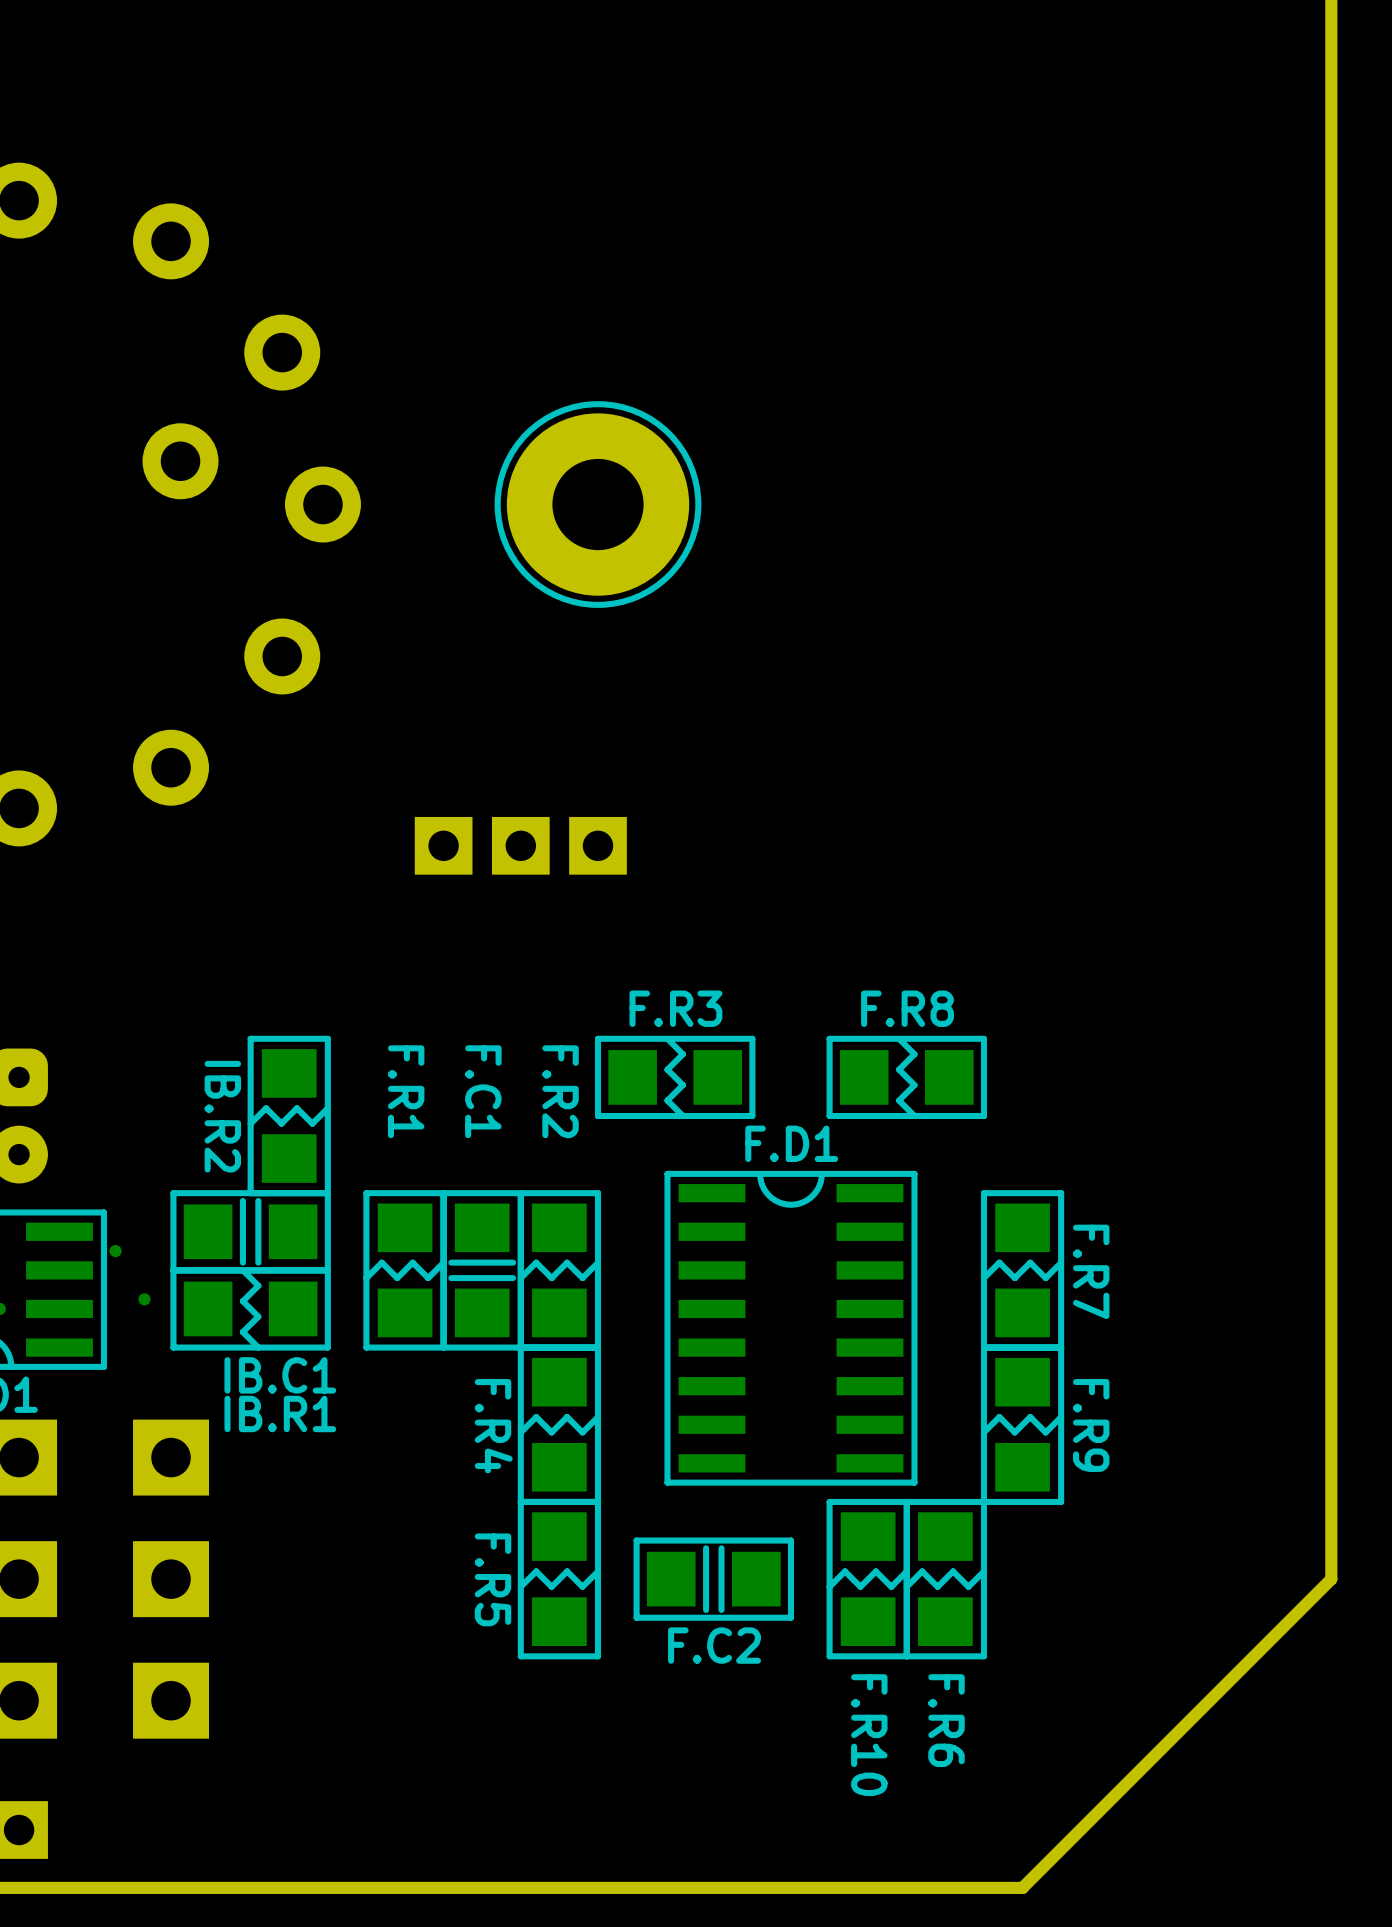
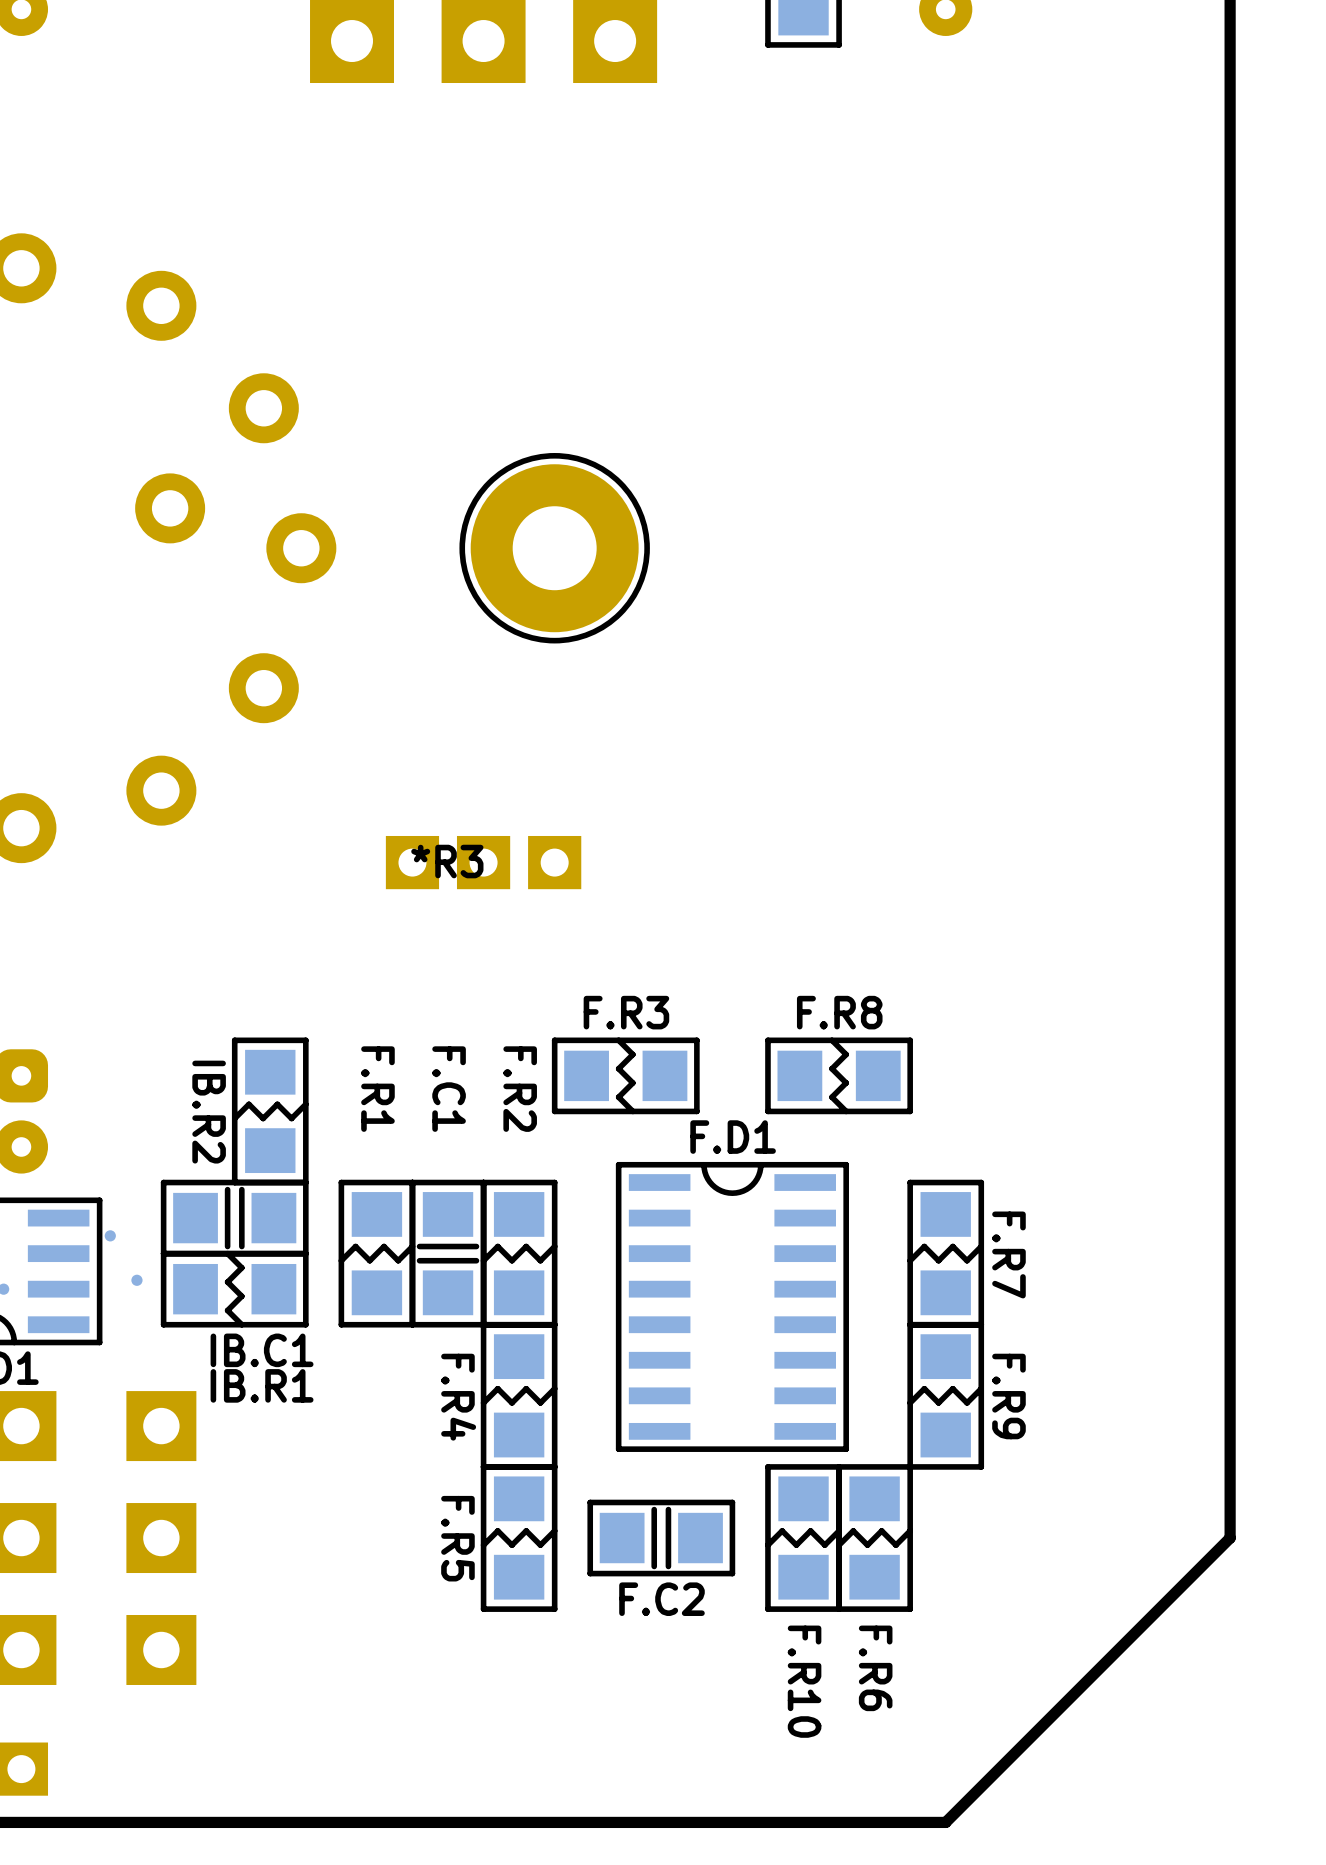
*R3: none -> (447, 861)

